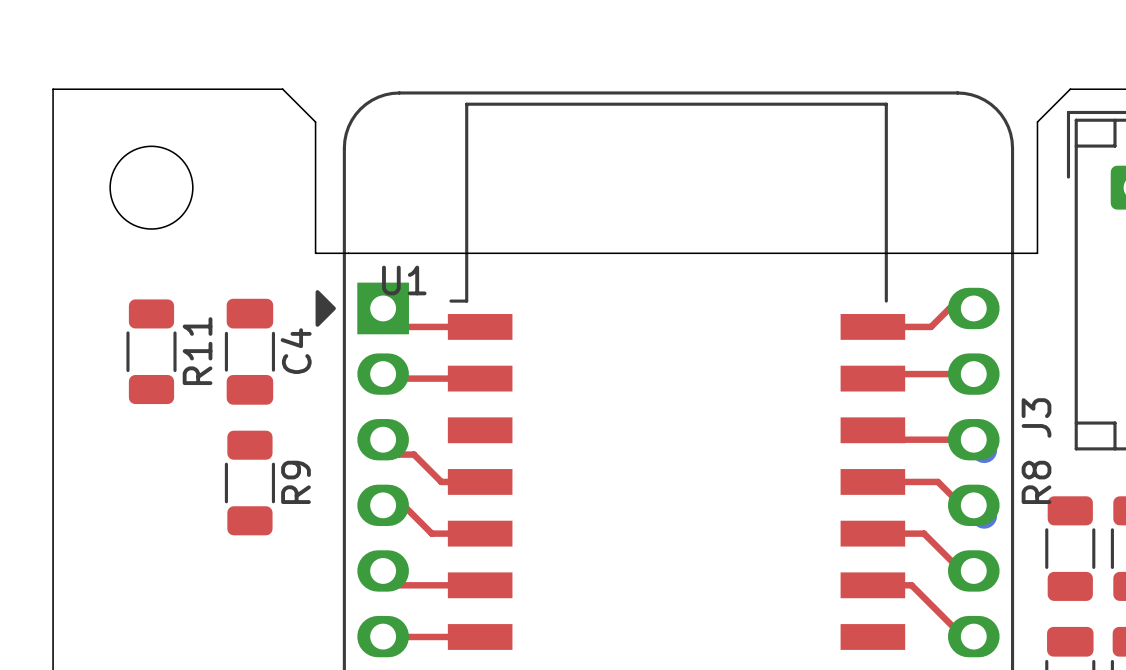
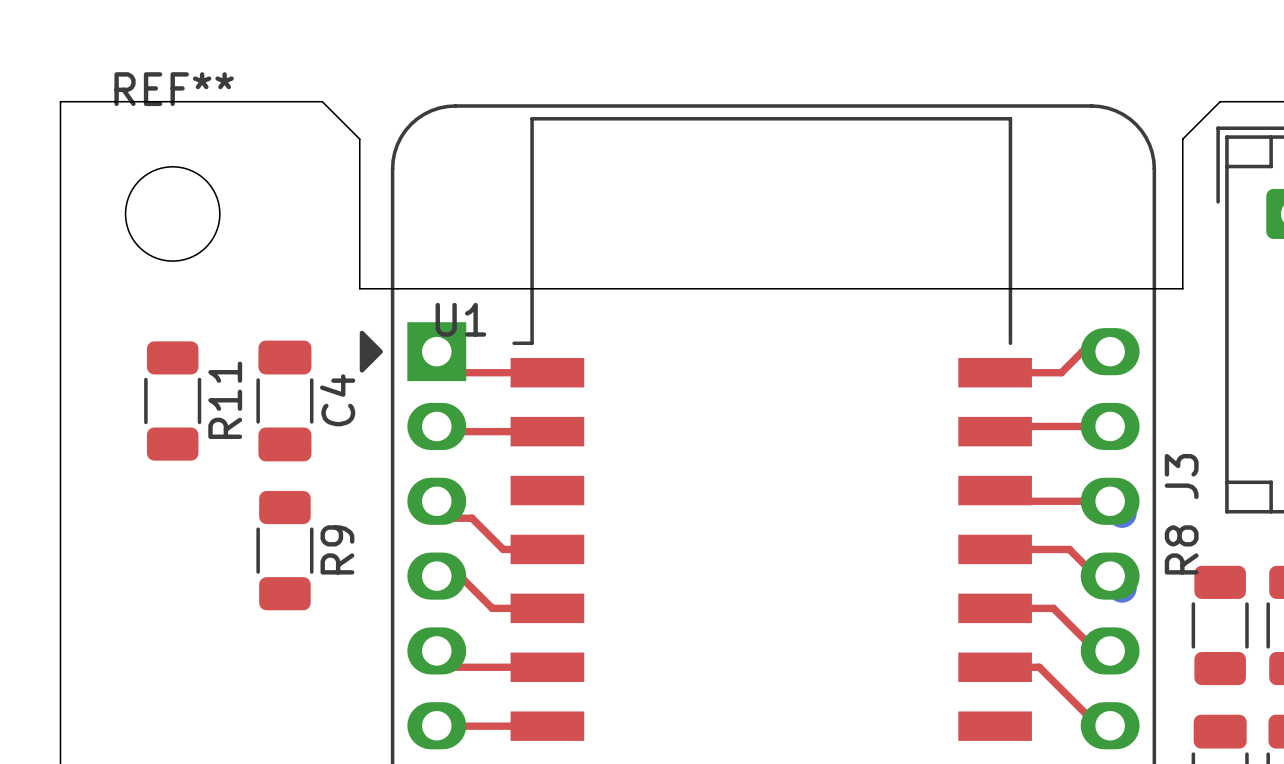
REF** name: none -> REF** (174, 89)

